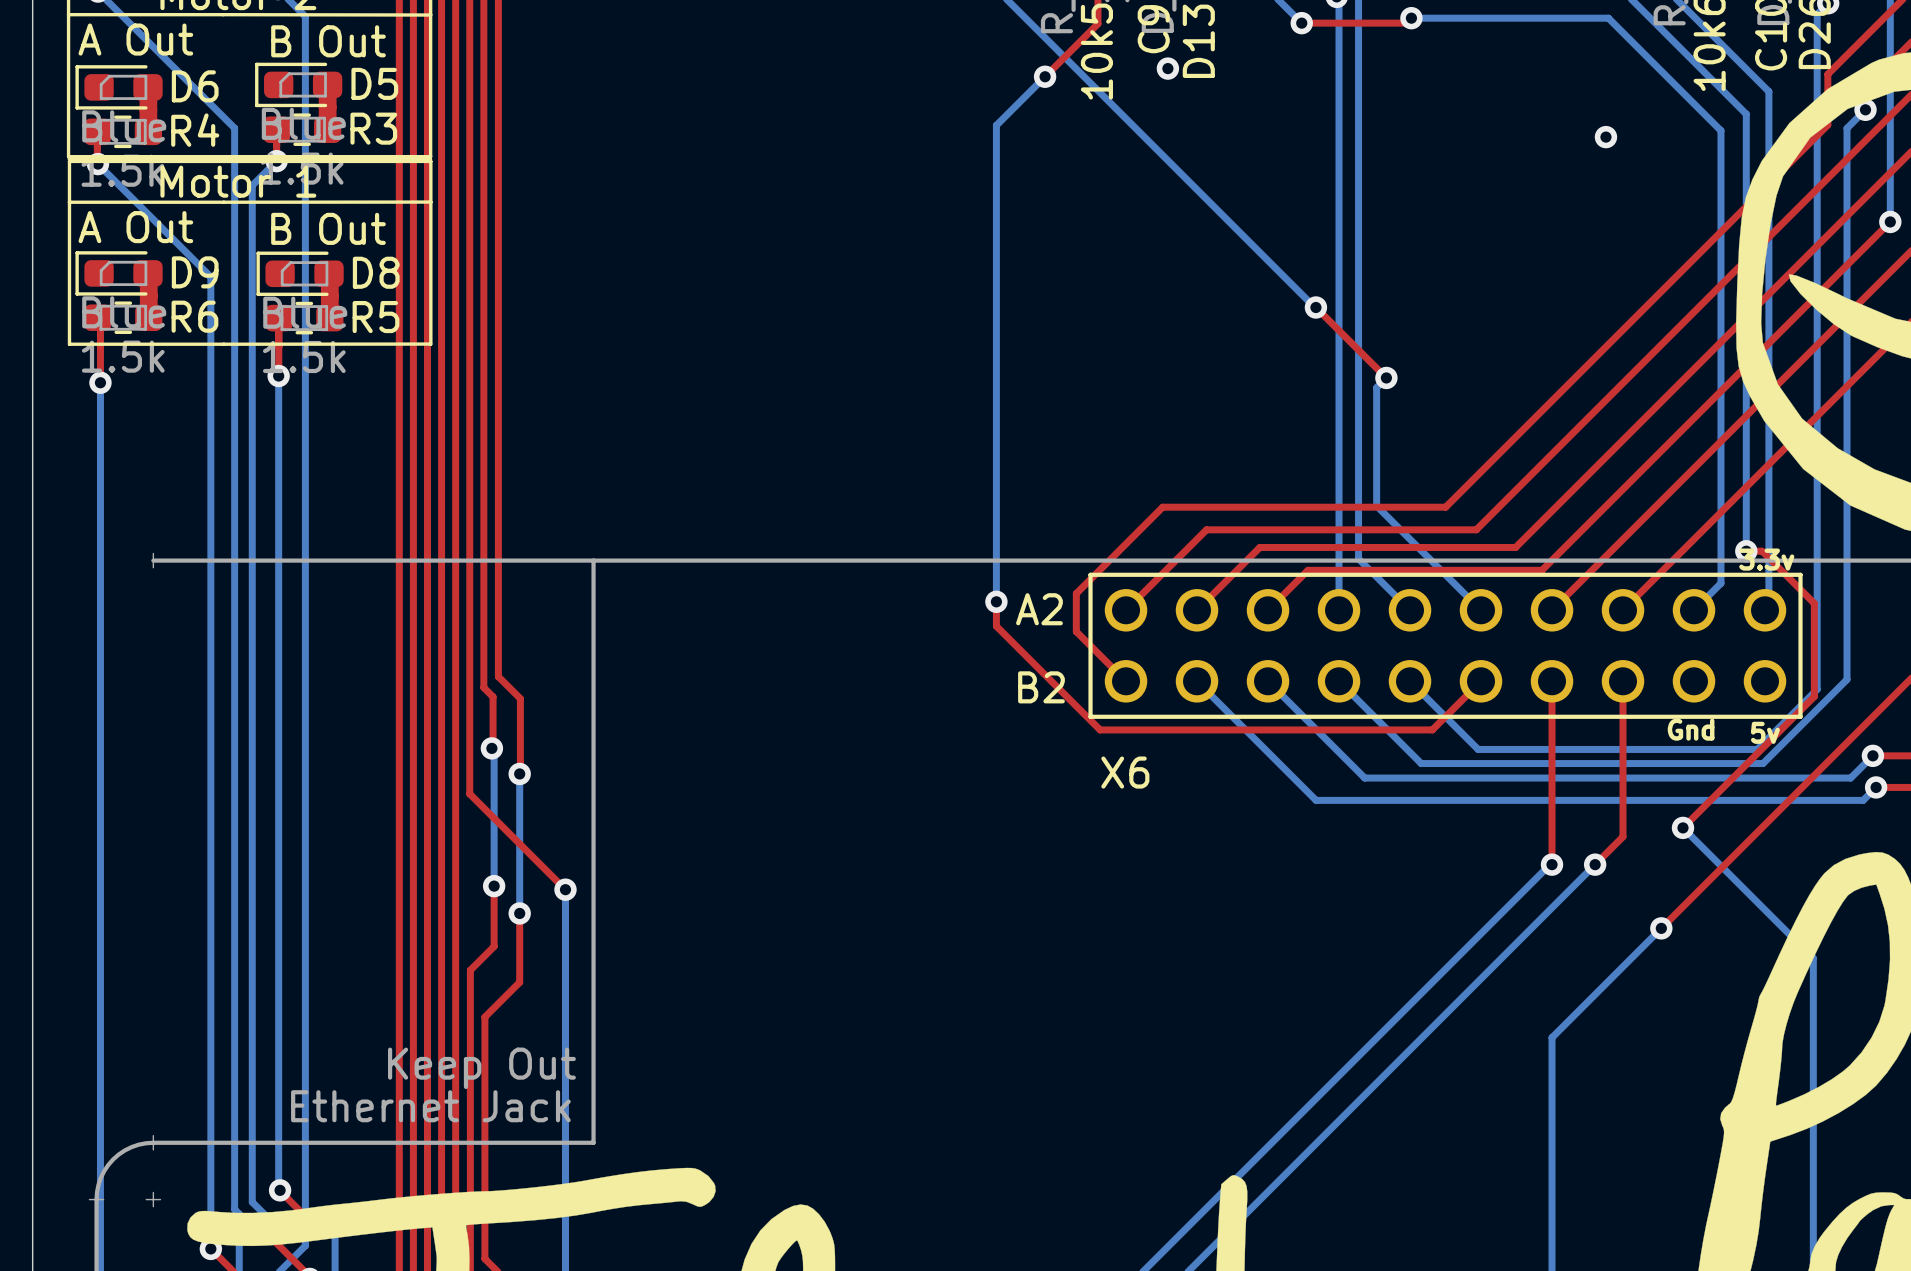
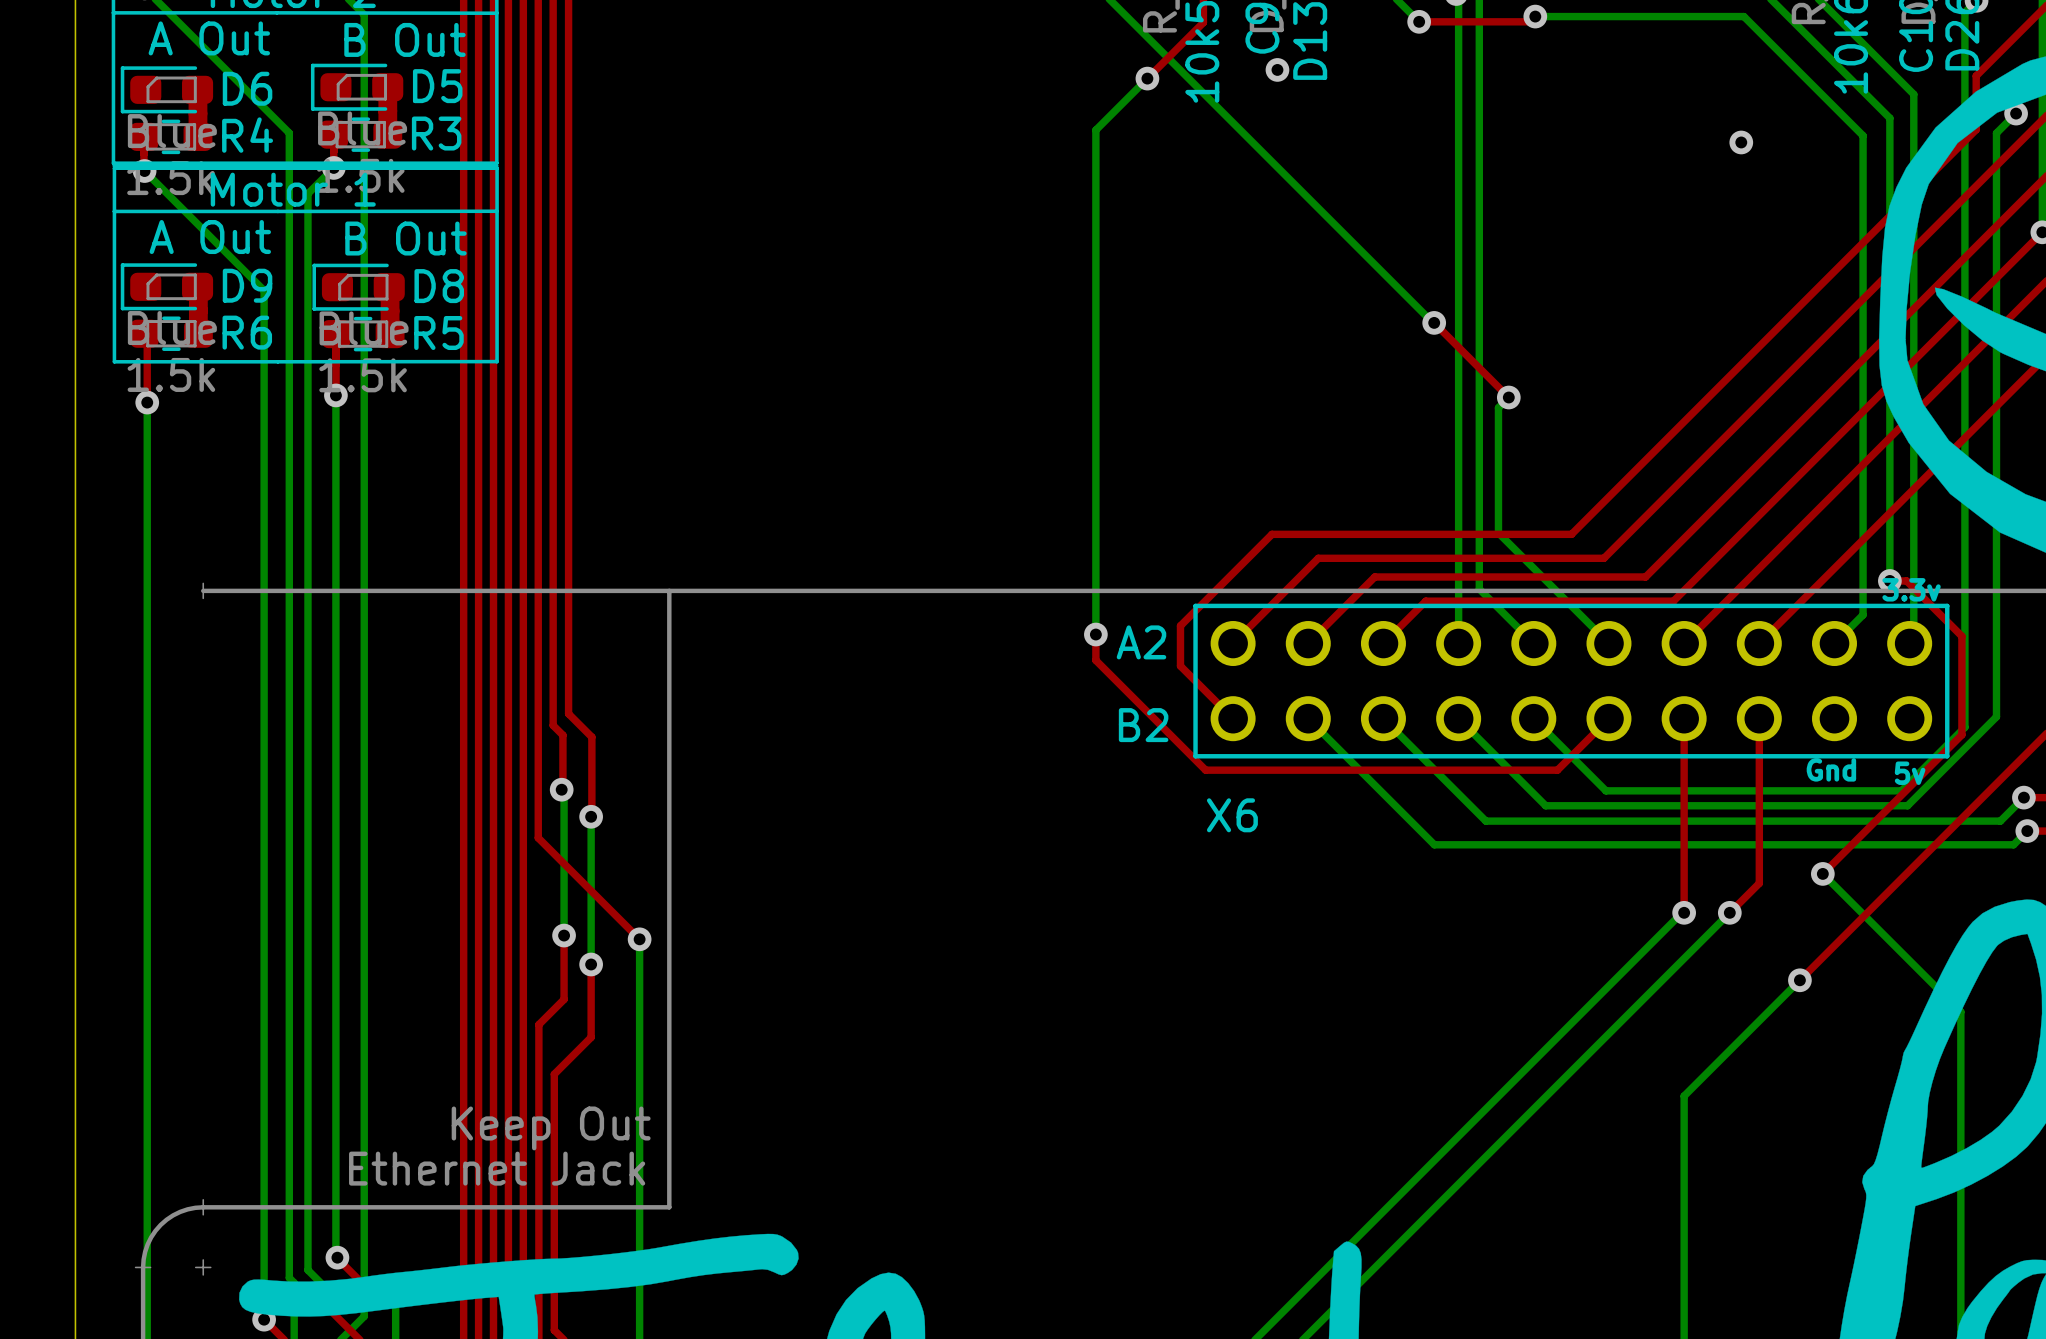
text position: A Out (135, 39) -> A Out (209, 38)
text position: B Out (328, 41) -> B Out (404, 39)
text position: A Out (135, 227) -> A Out (210, 237)
text position: B Out (328, 228) -> B Out (405, 238)

